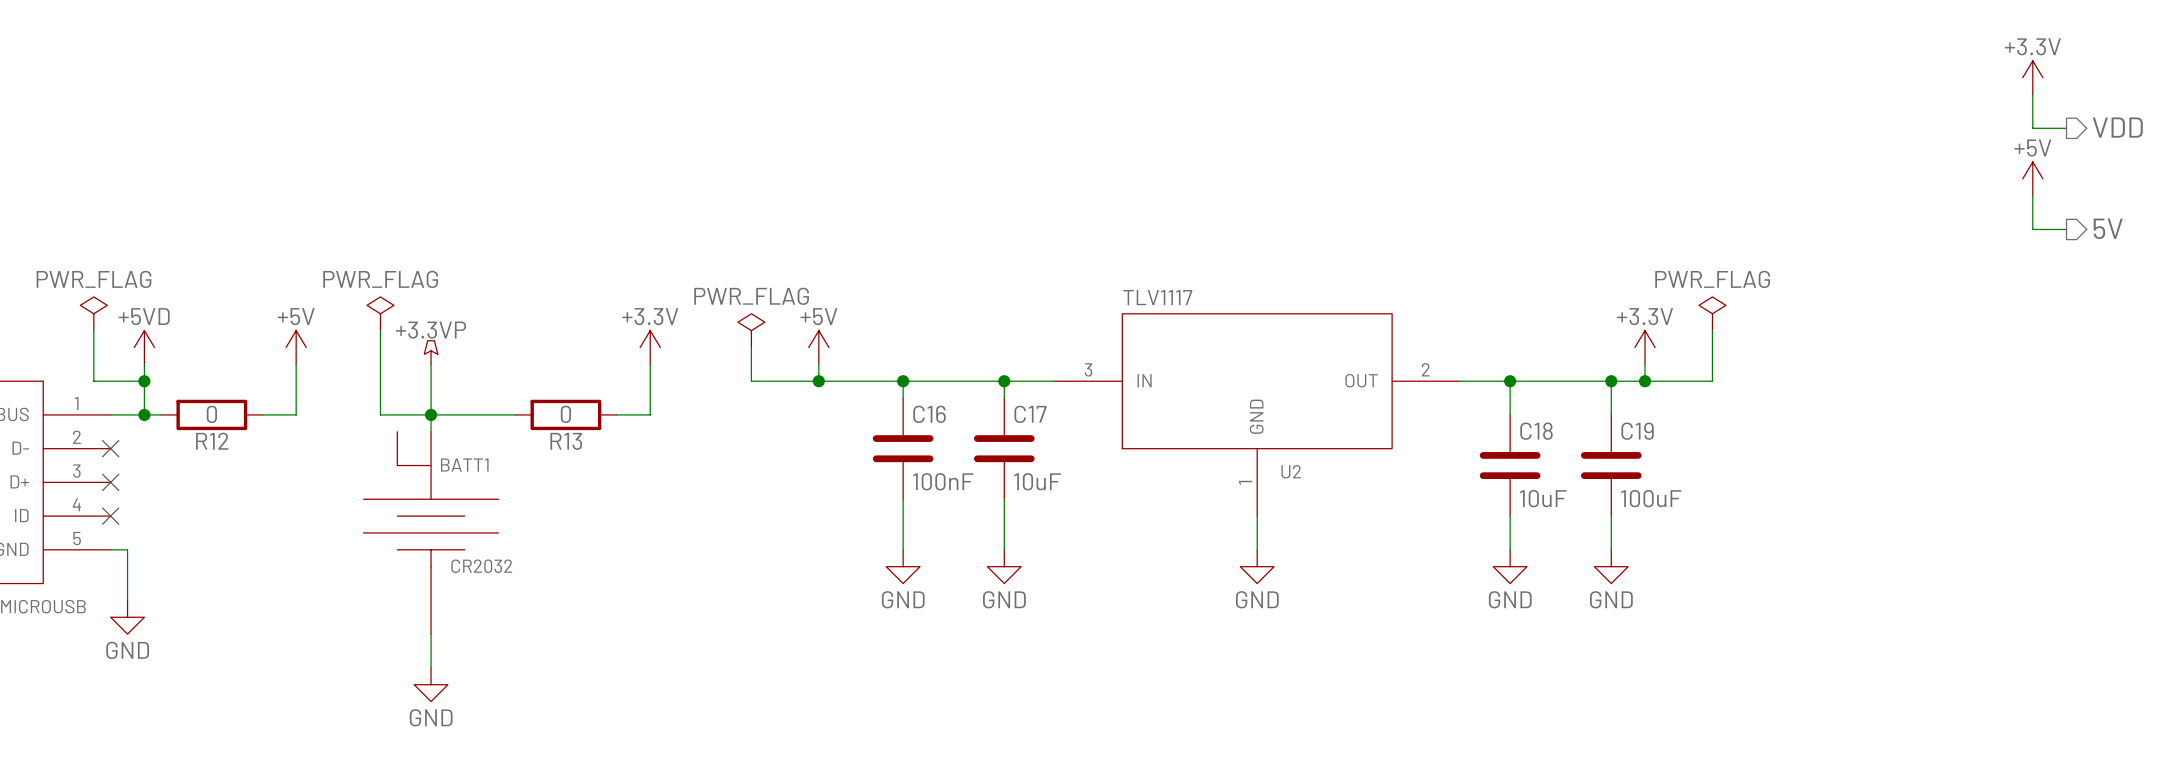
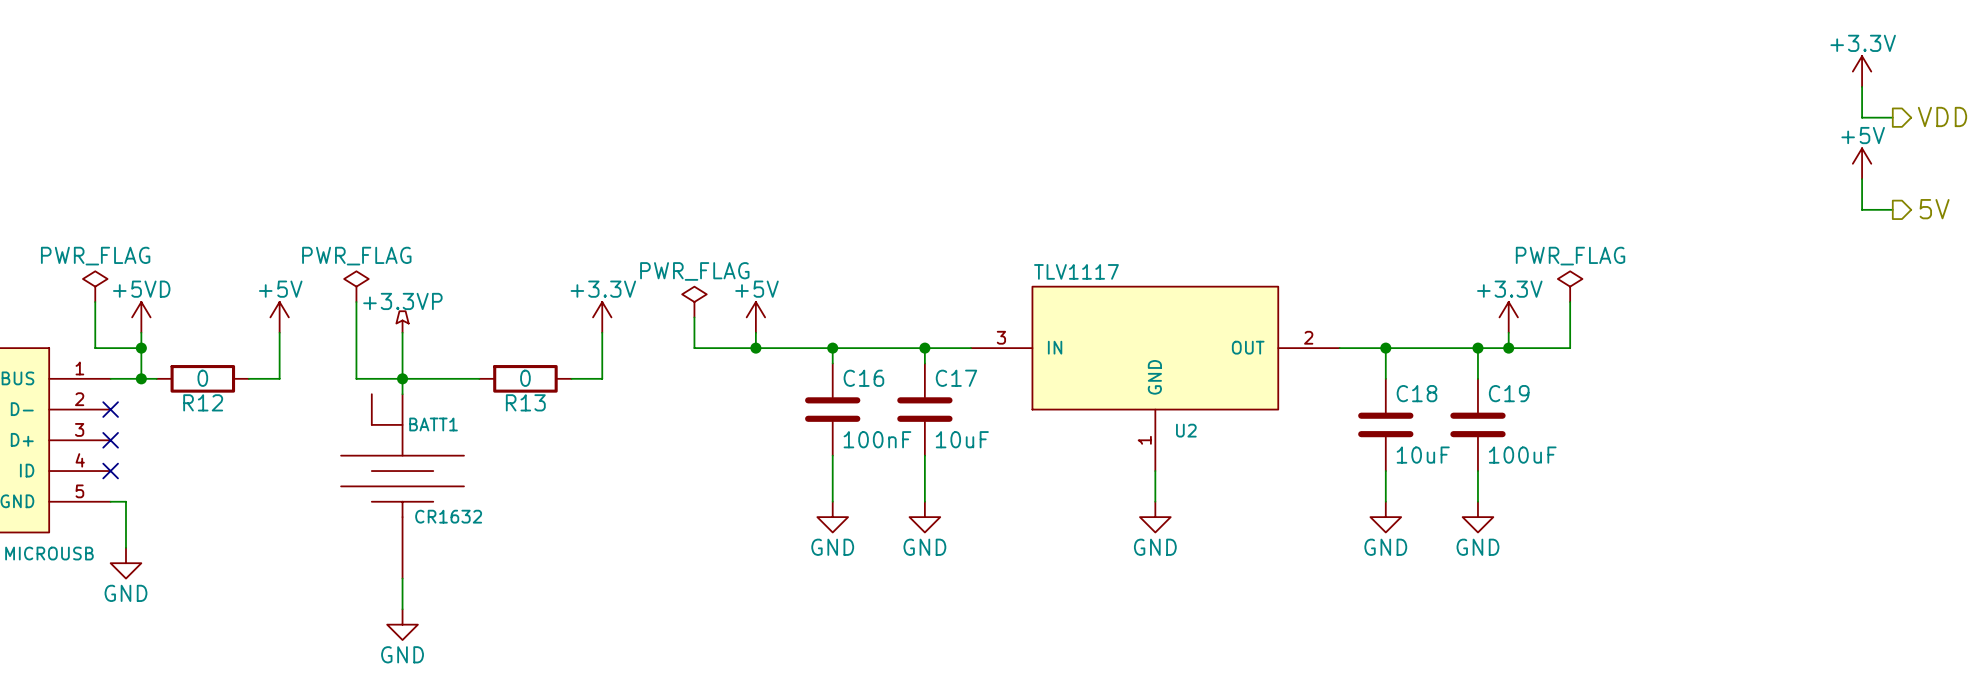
BATT1 value: CR2032 (481, 566) -> CR1632 (448, 516)

